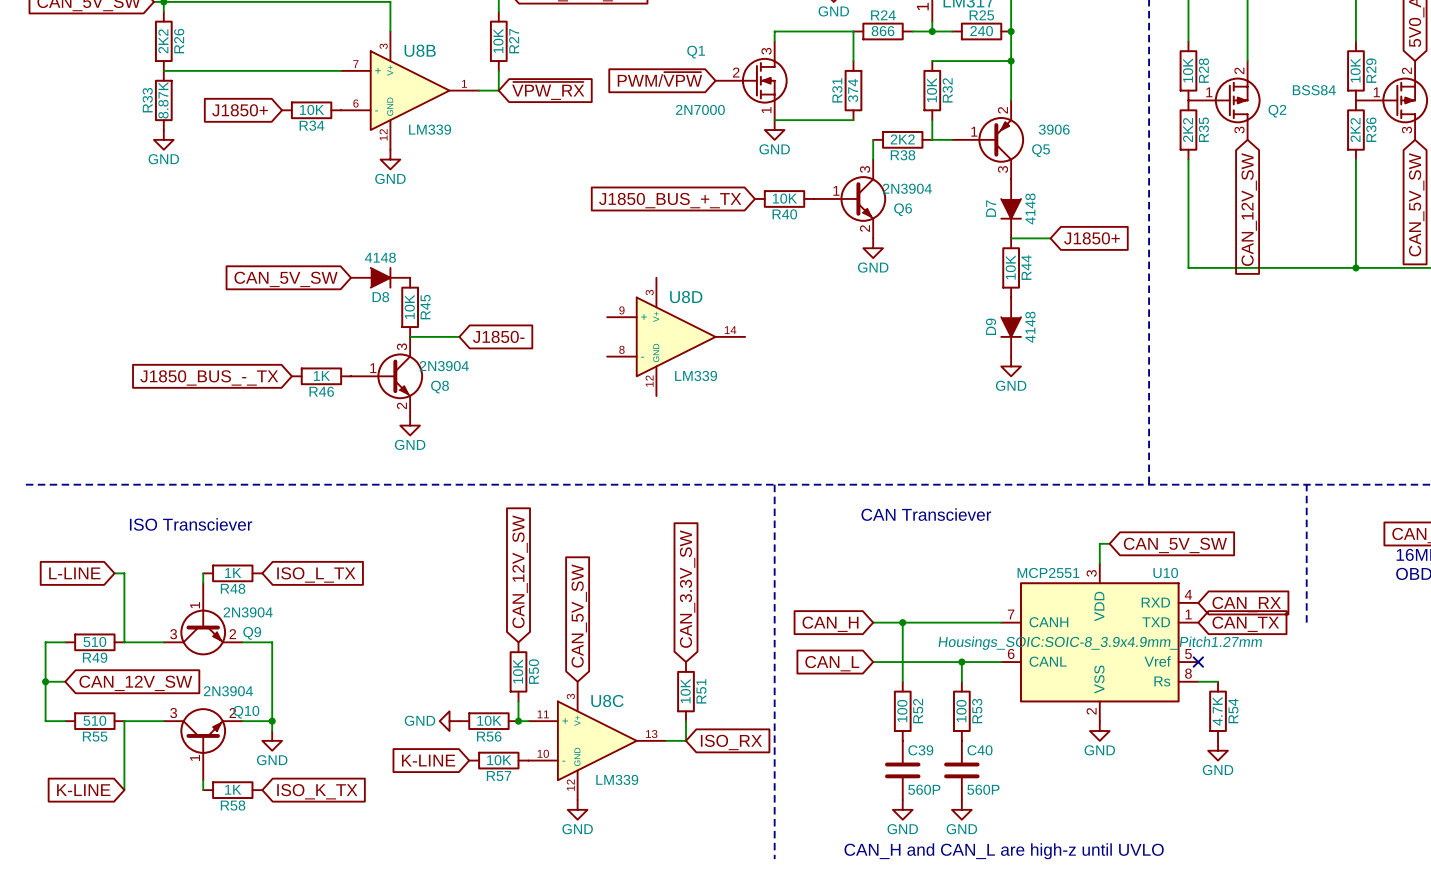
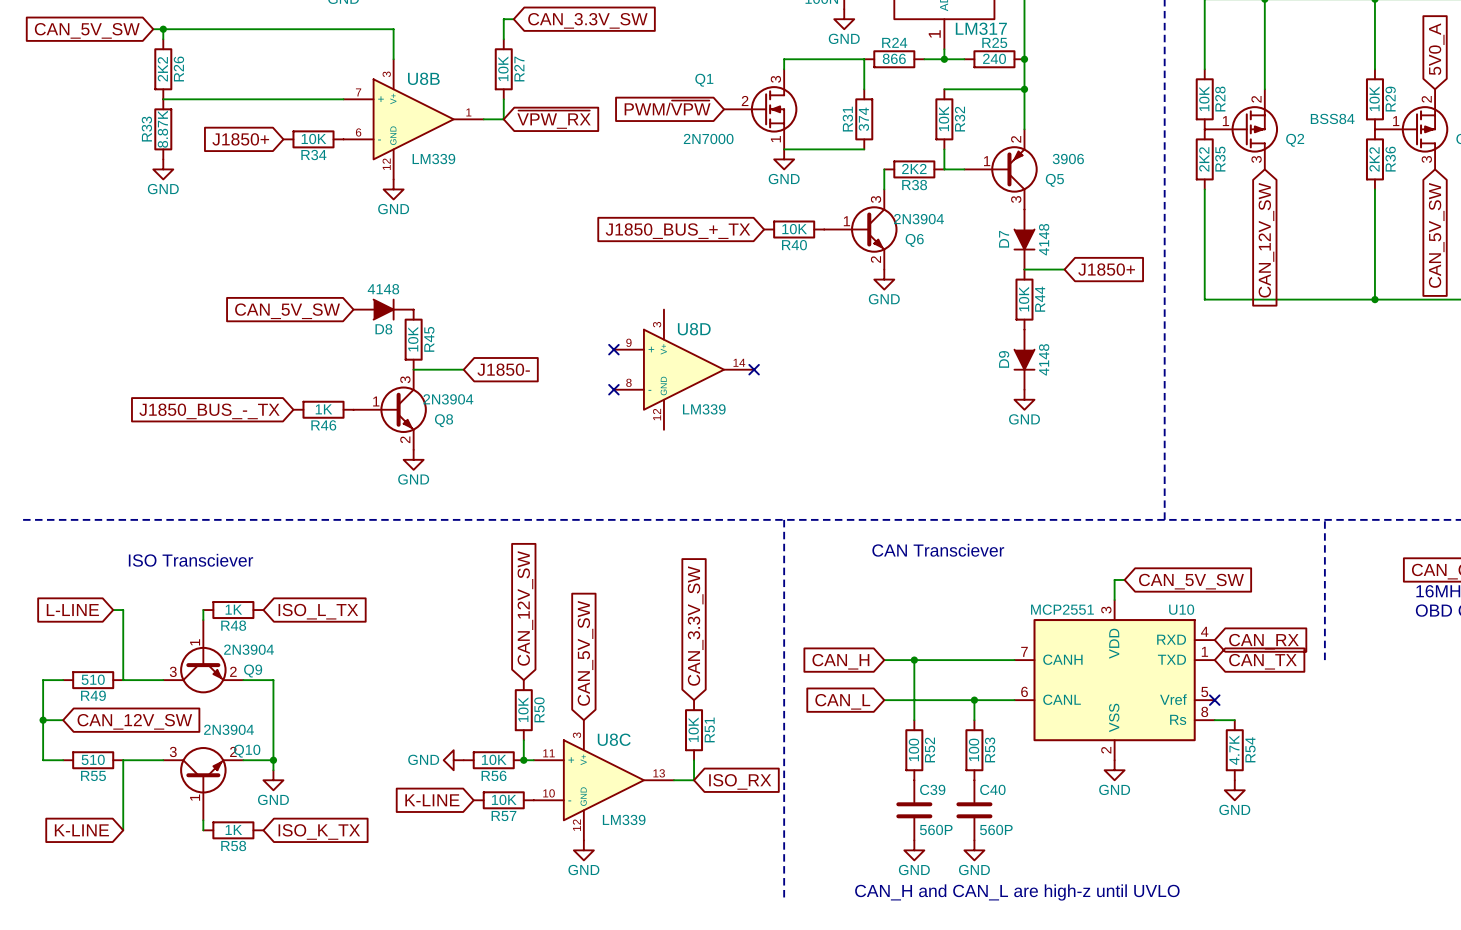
no-connect mark: none -> (613, 349)
no-connect mark: none -> (754, 369)
no-connect mark: none -> (613, 389)
U10 text: Housings_SOIC:SOIC-8_3.9x4.9mm_Pitch1.27mm (1100, 643) -> none

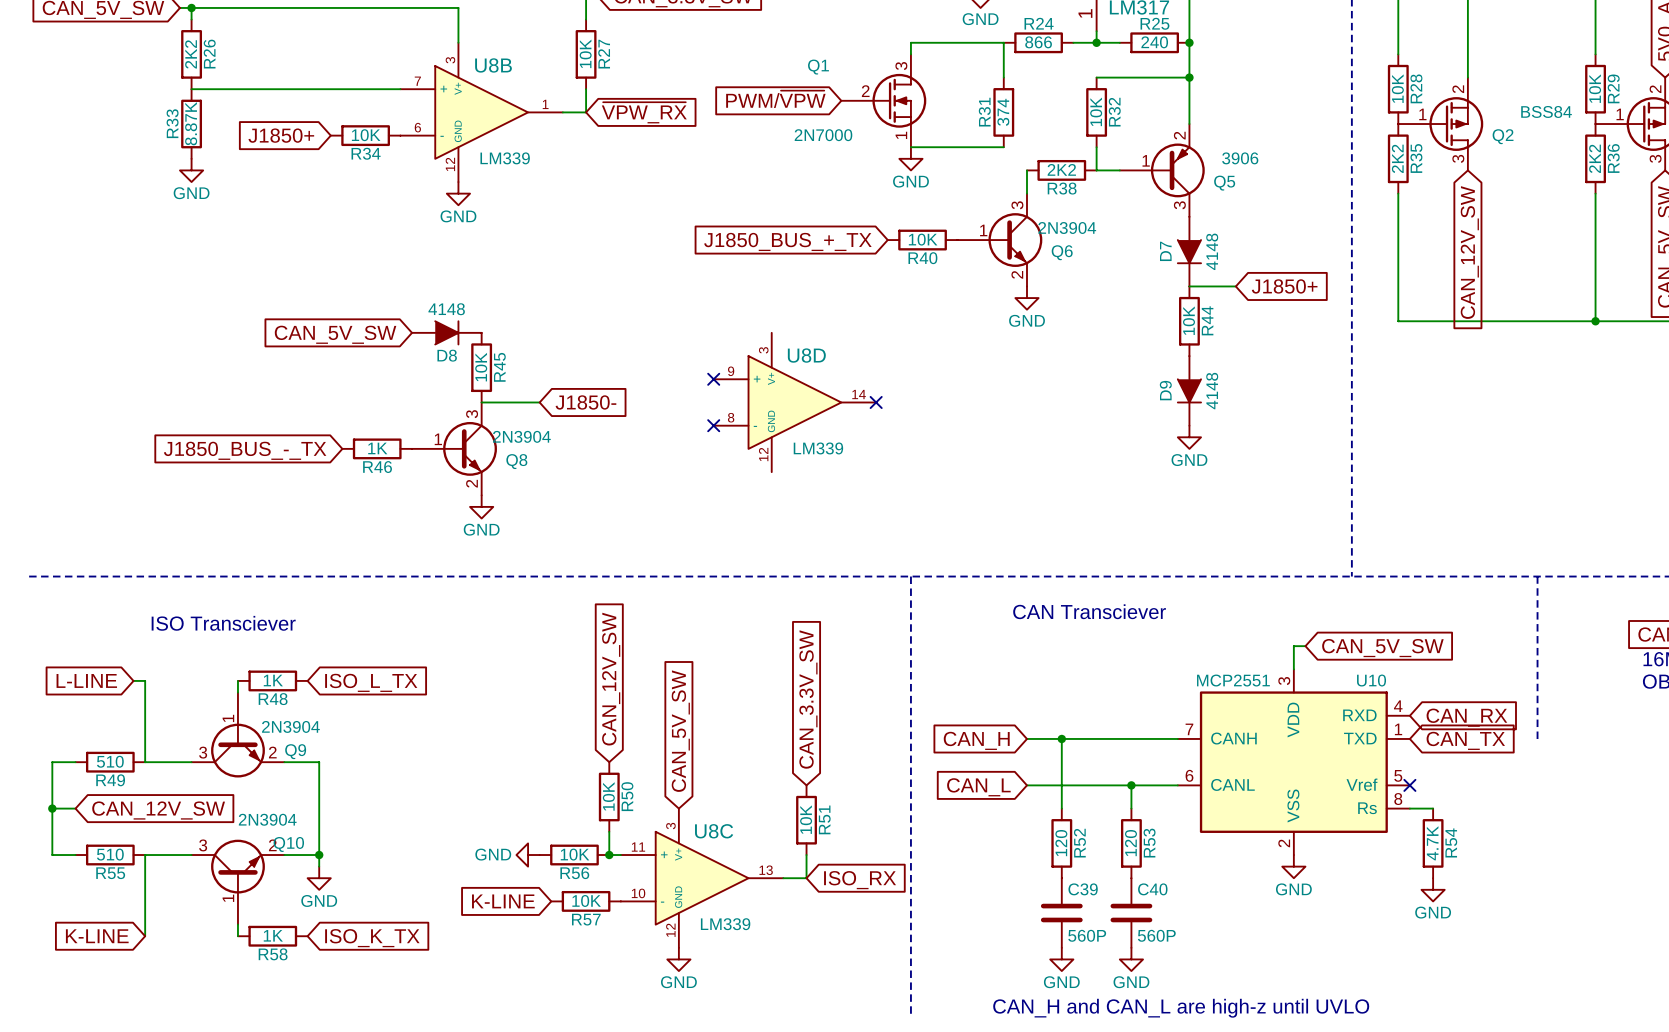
R52 value: 100 (913, 749) -> 120 (1061, 843)
R53 value: 100 (974, 749) -> 120 (1130, 843)

